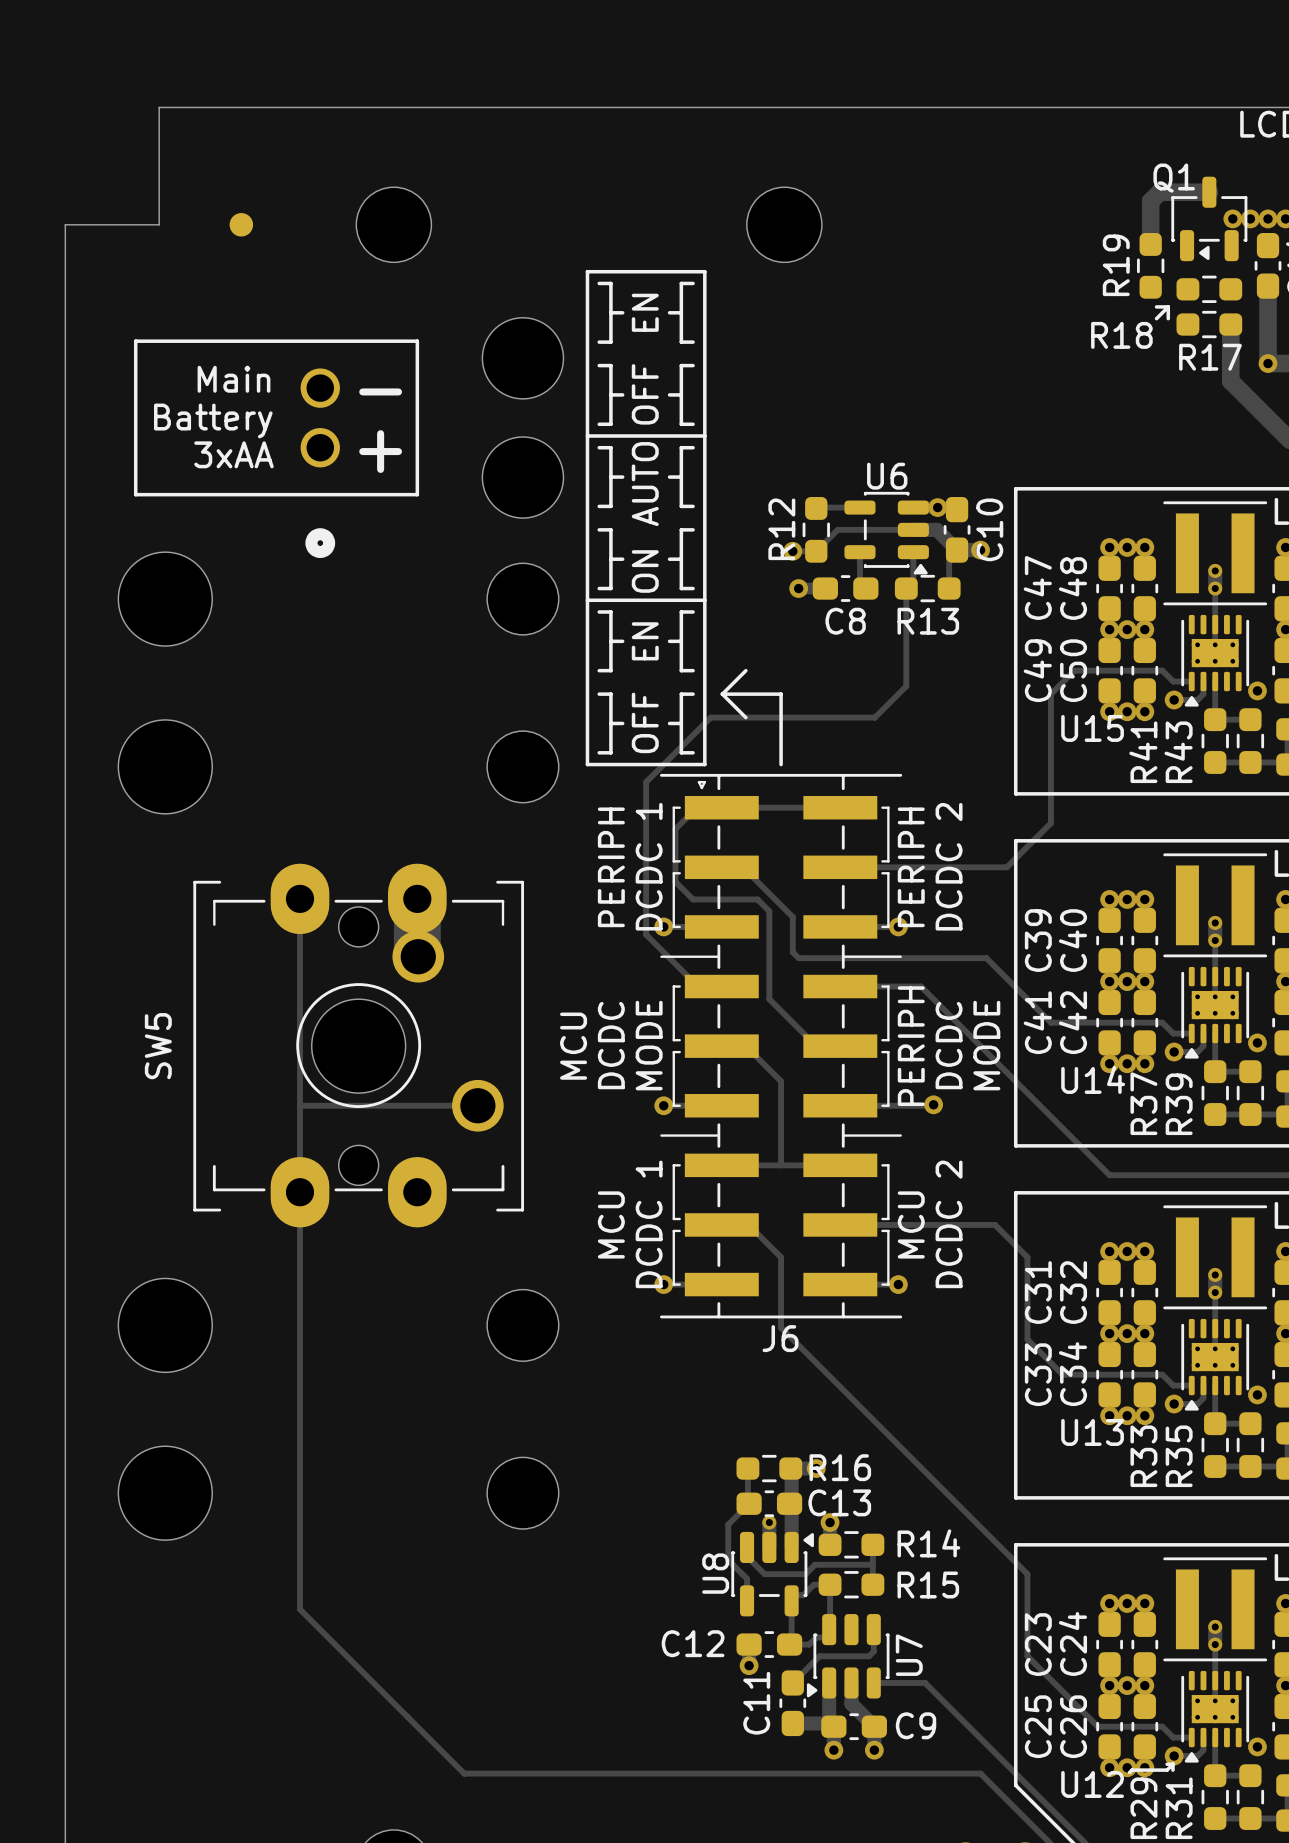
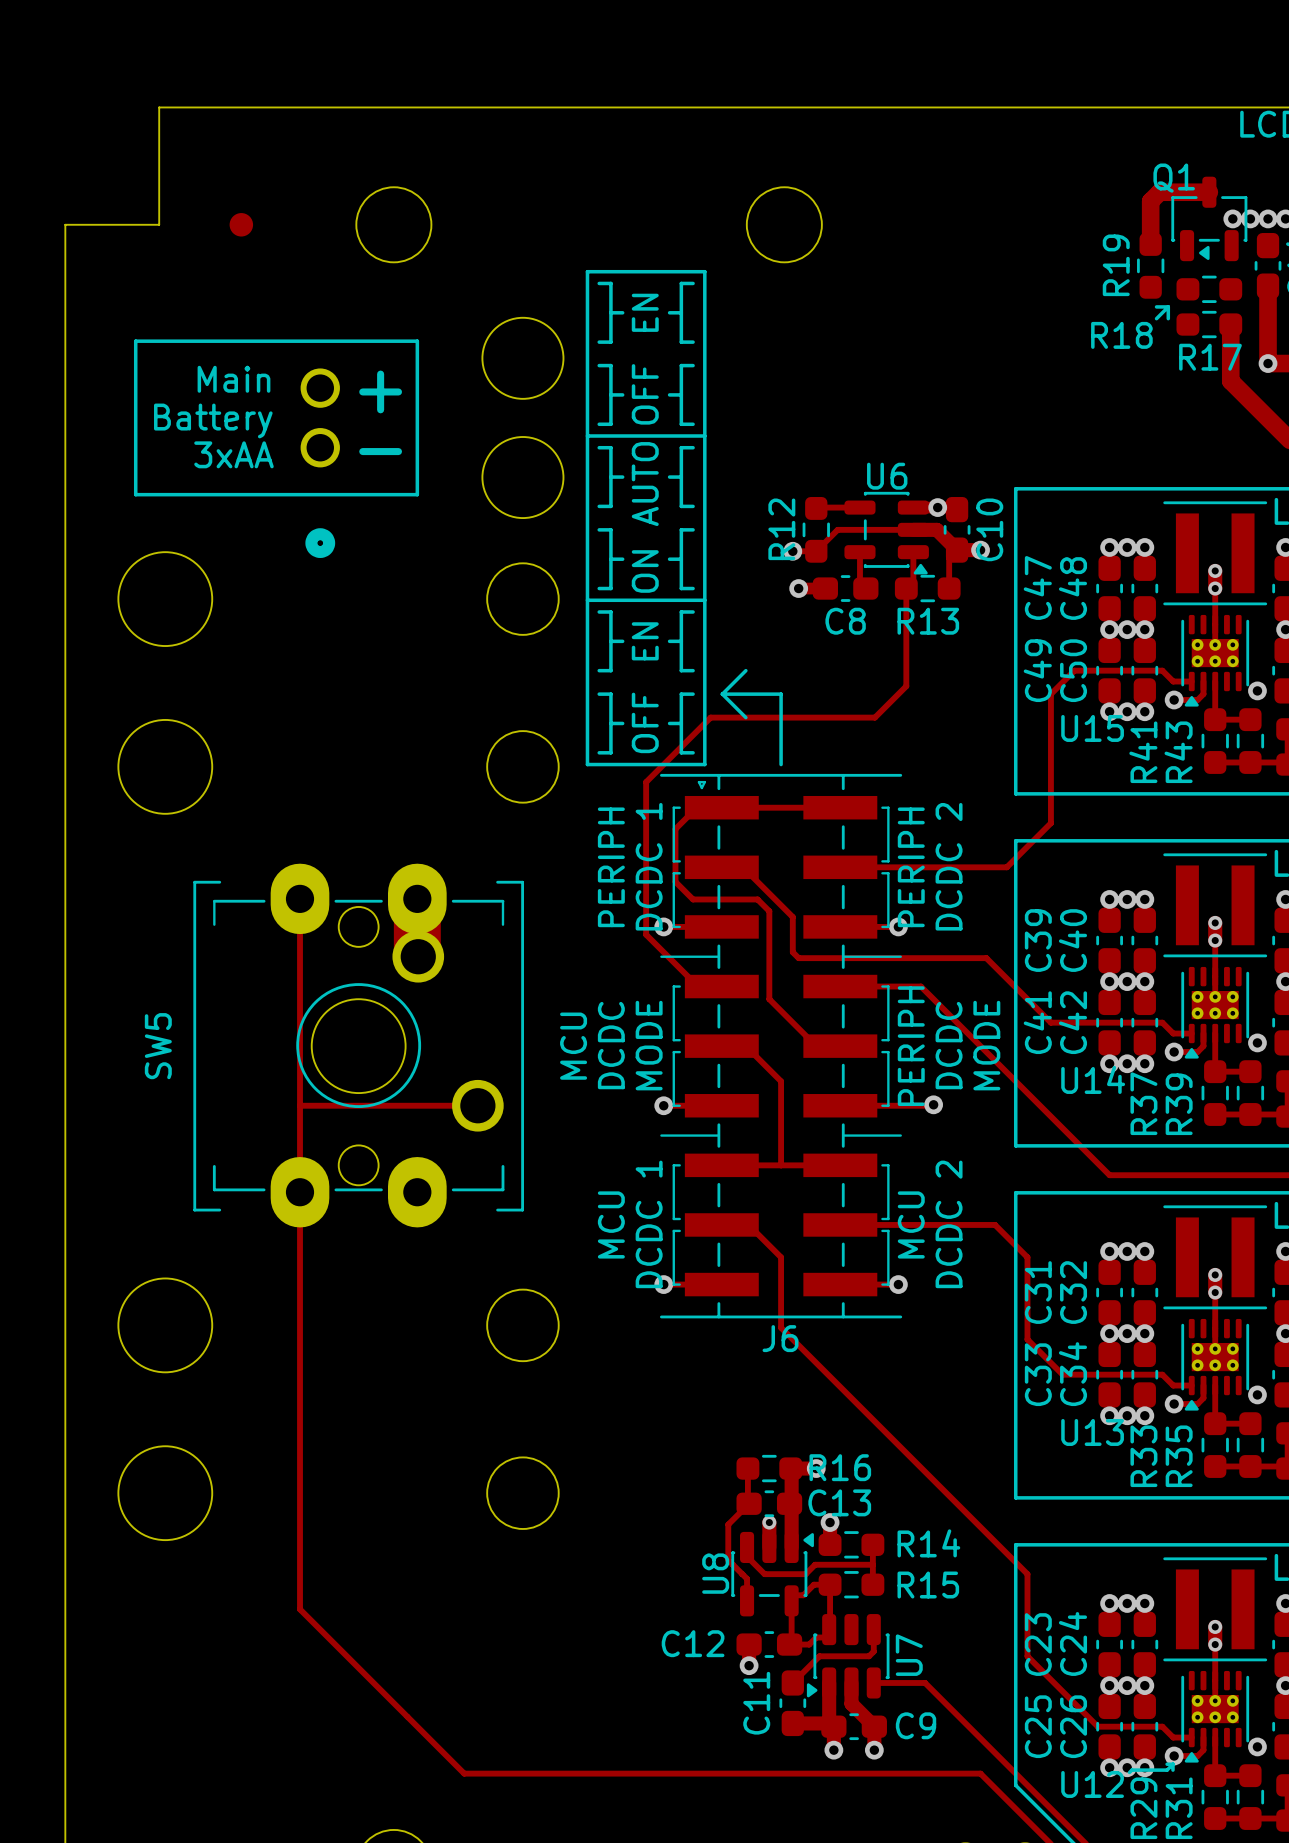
text: - (380, 391) -> + (380, 391)
text: + (380, 451) -> - (380, 451)

